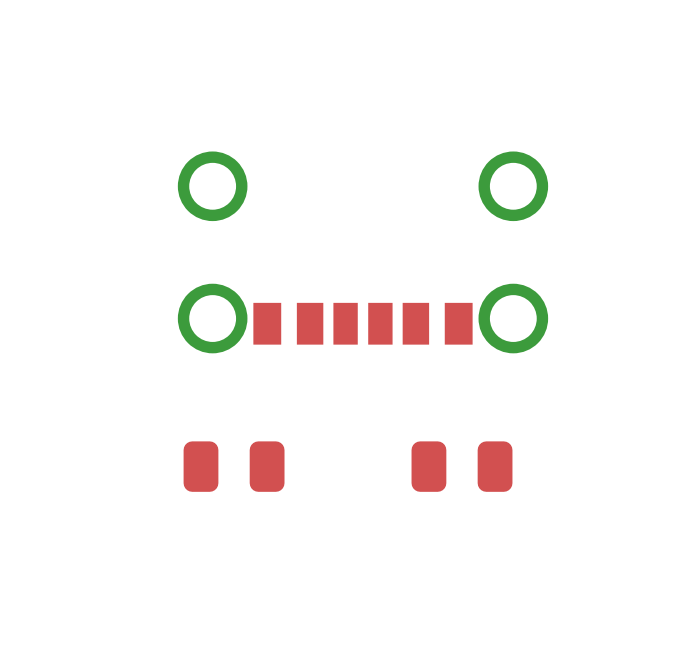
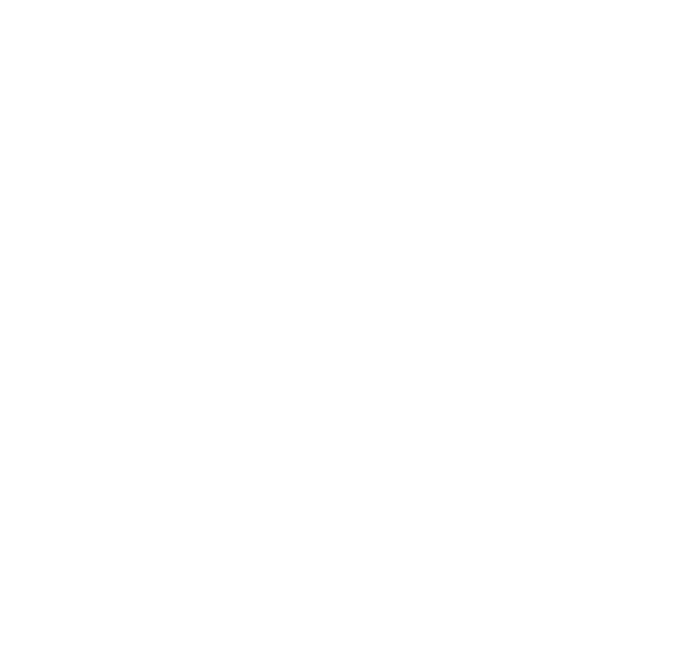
part: (362, 252) -> none
part: (234, 466) -> none
part: (461, 466) -> none

